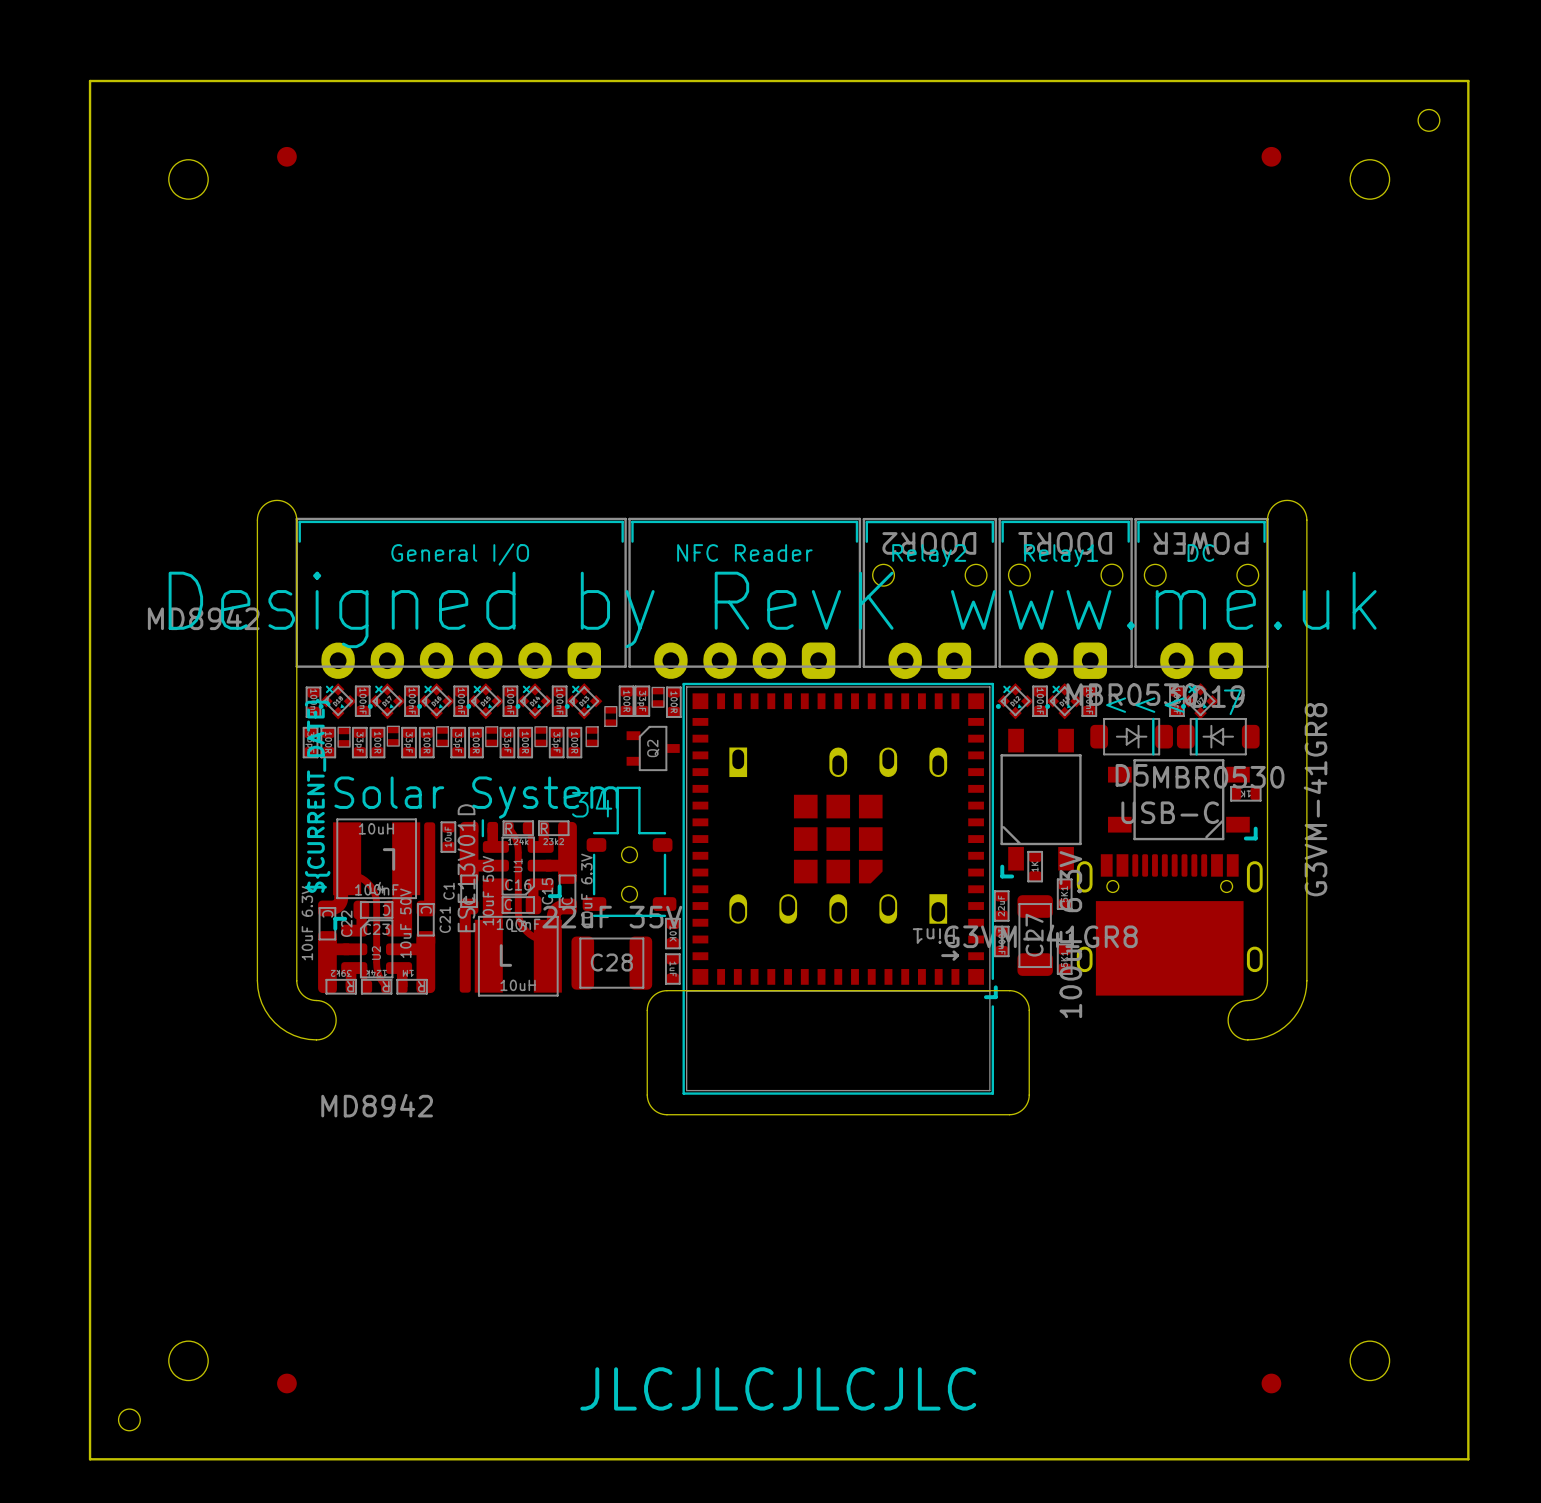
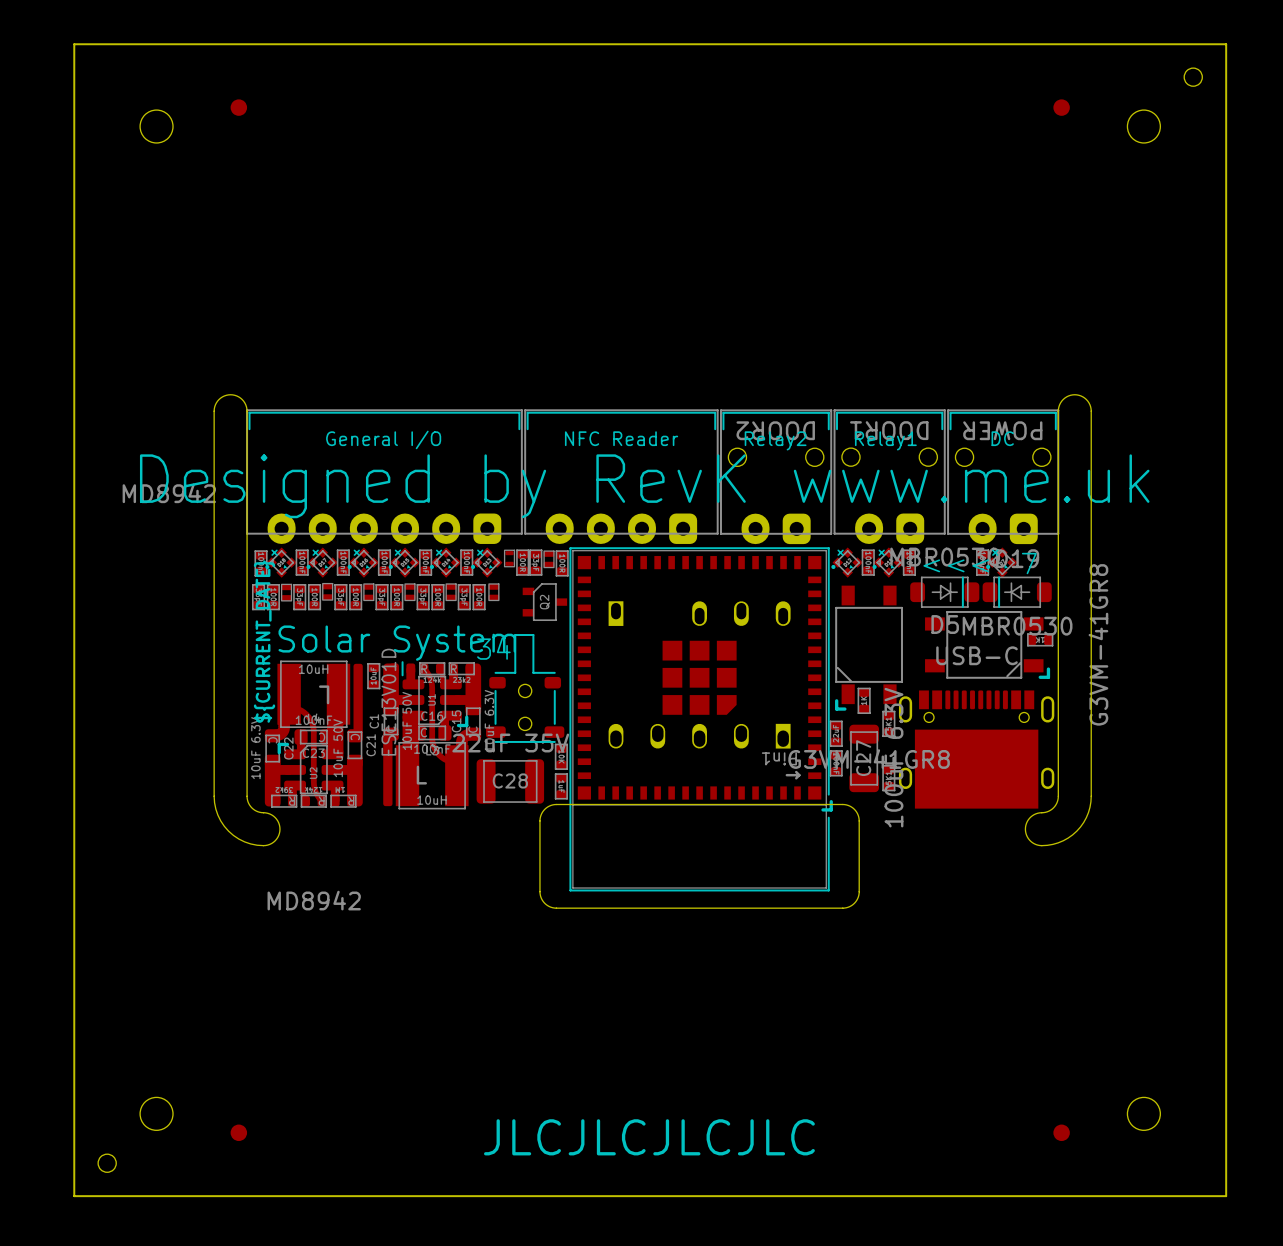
part: none -> (509, 558)
part: (610, 716) -> none

